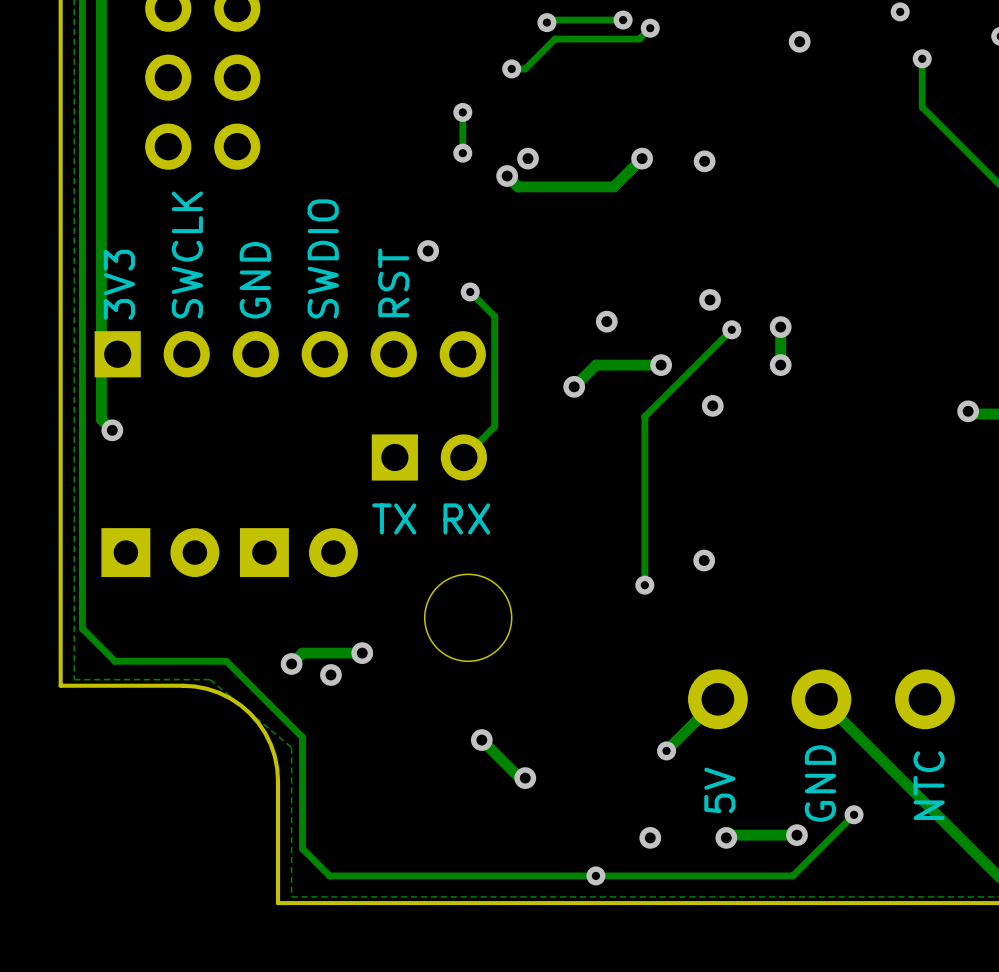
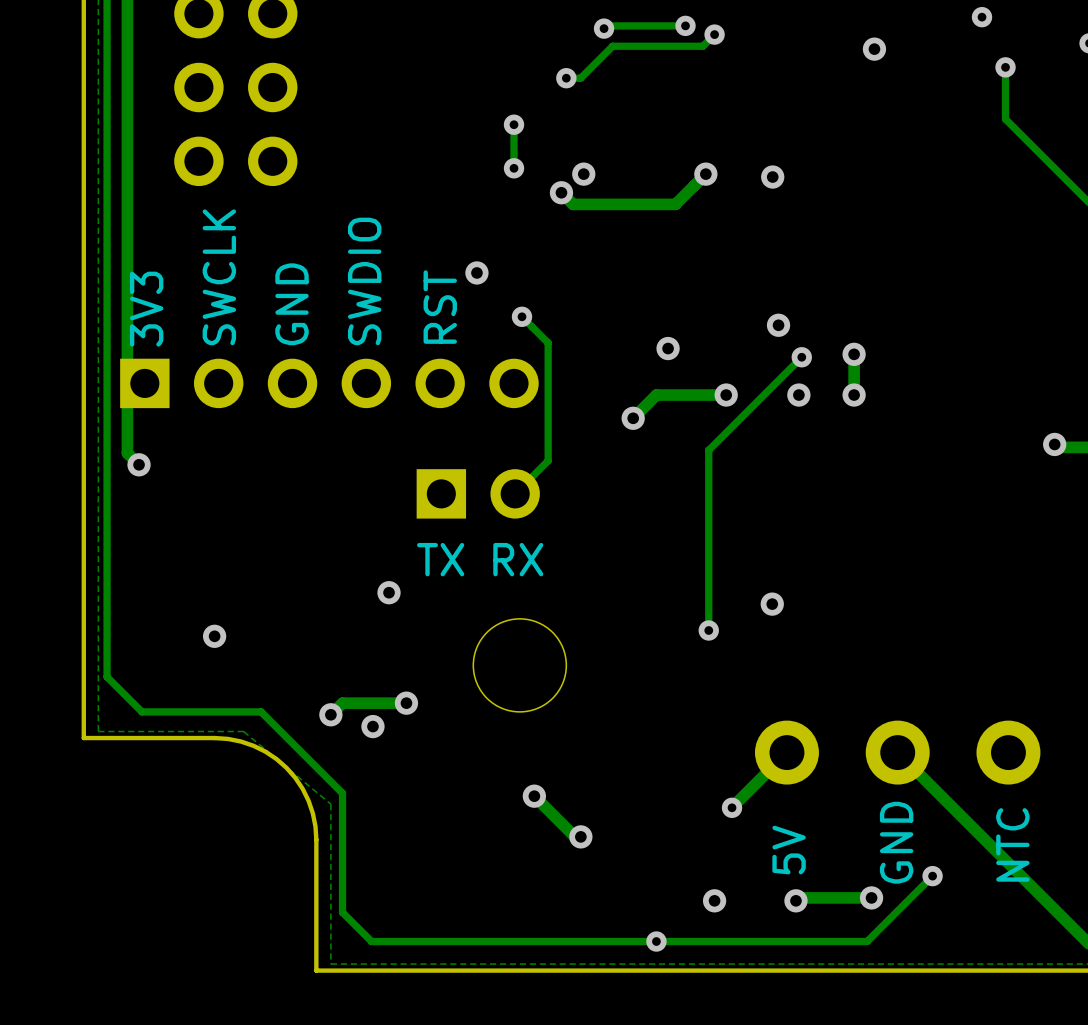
via position: (712, 405) -> (798, 395)
via: none -> (389, 592)
part: (160, 552) -> none
part: (298, 552) -> none
via: none -> (214, 636)

